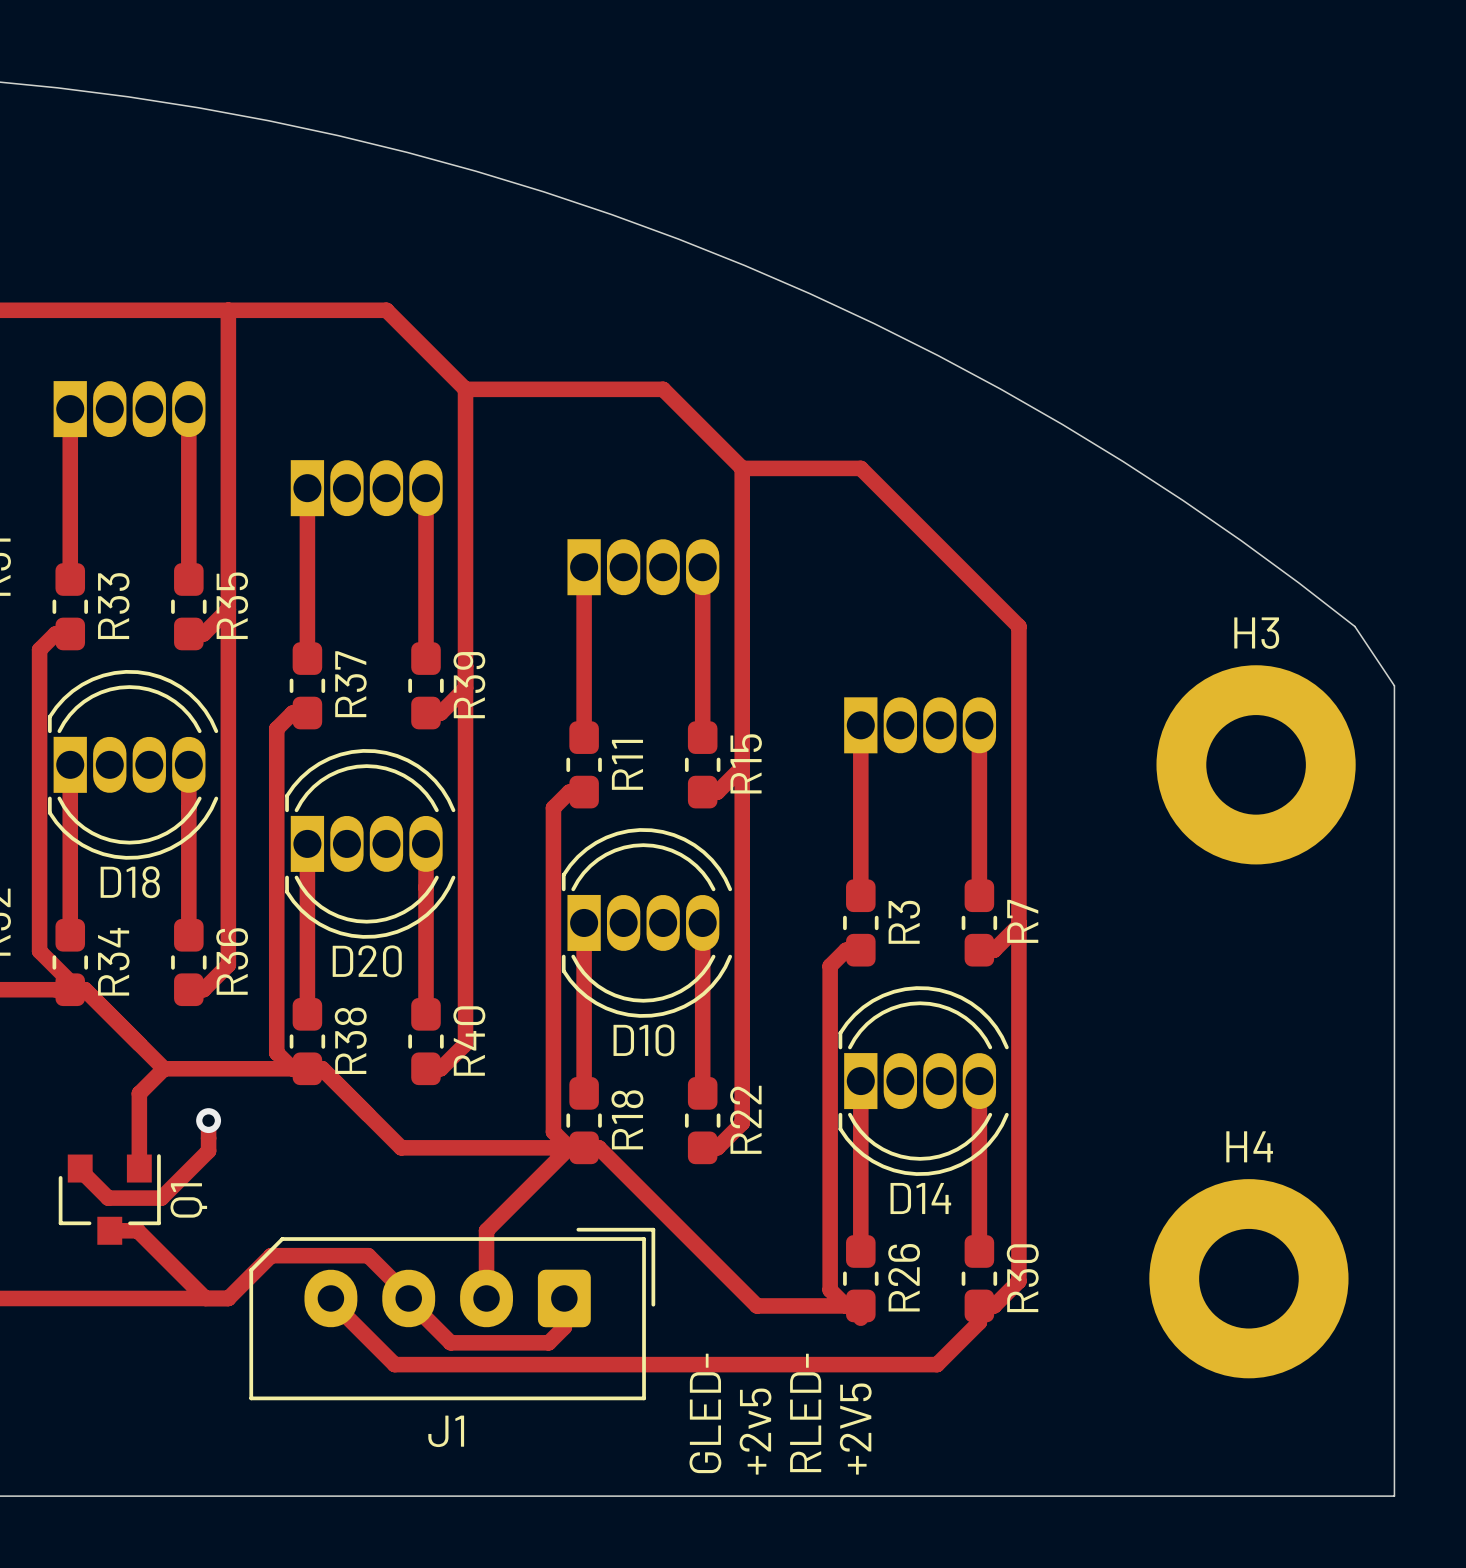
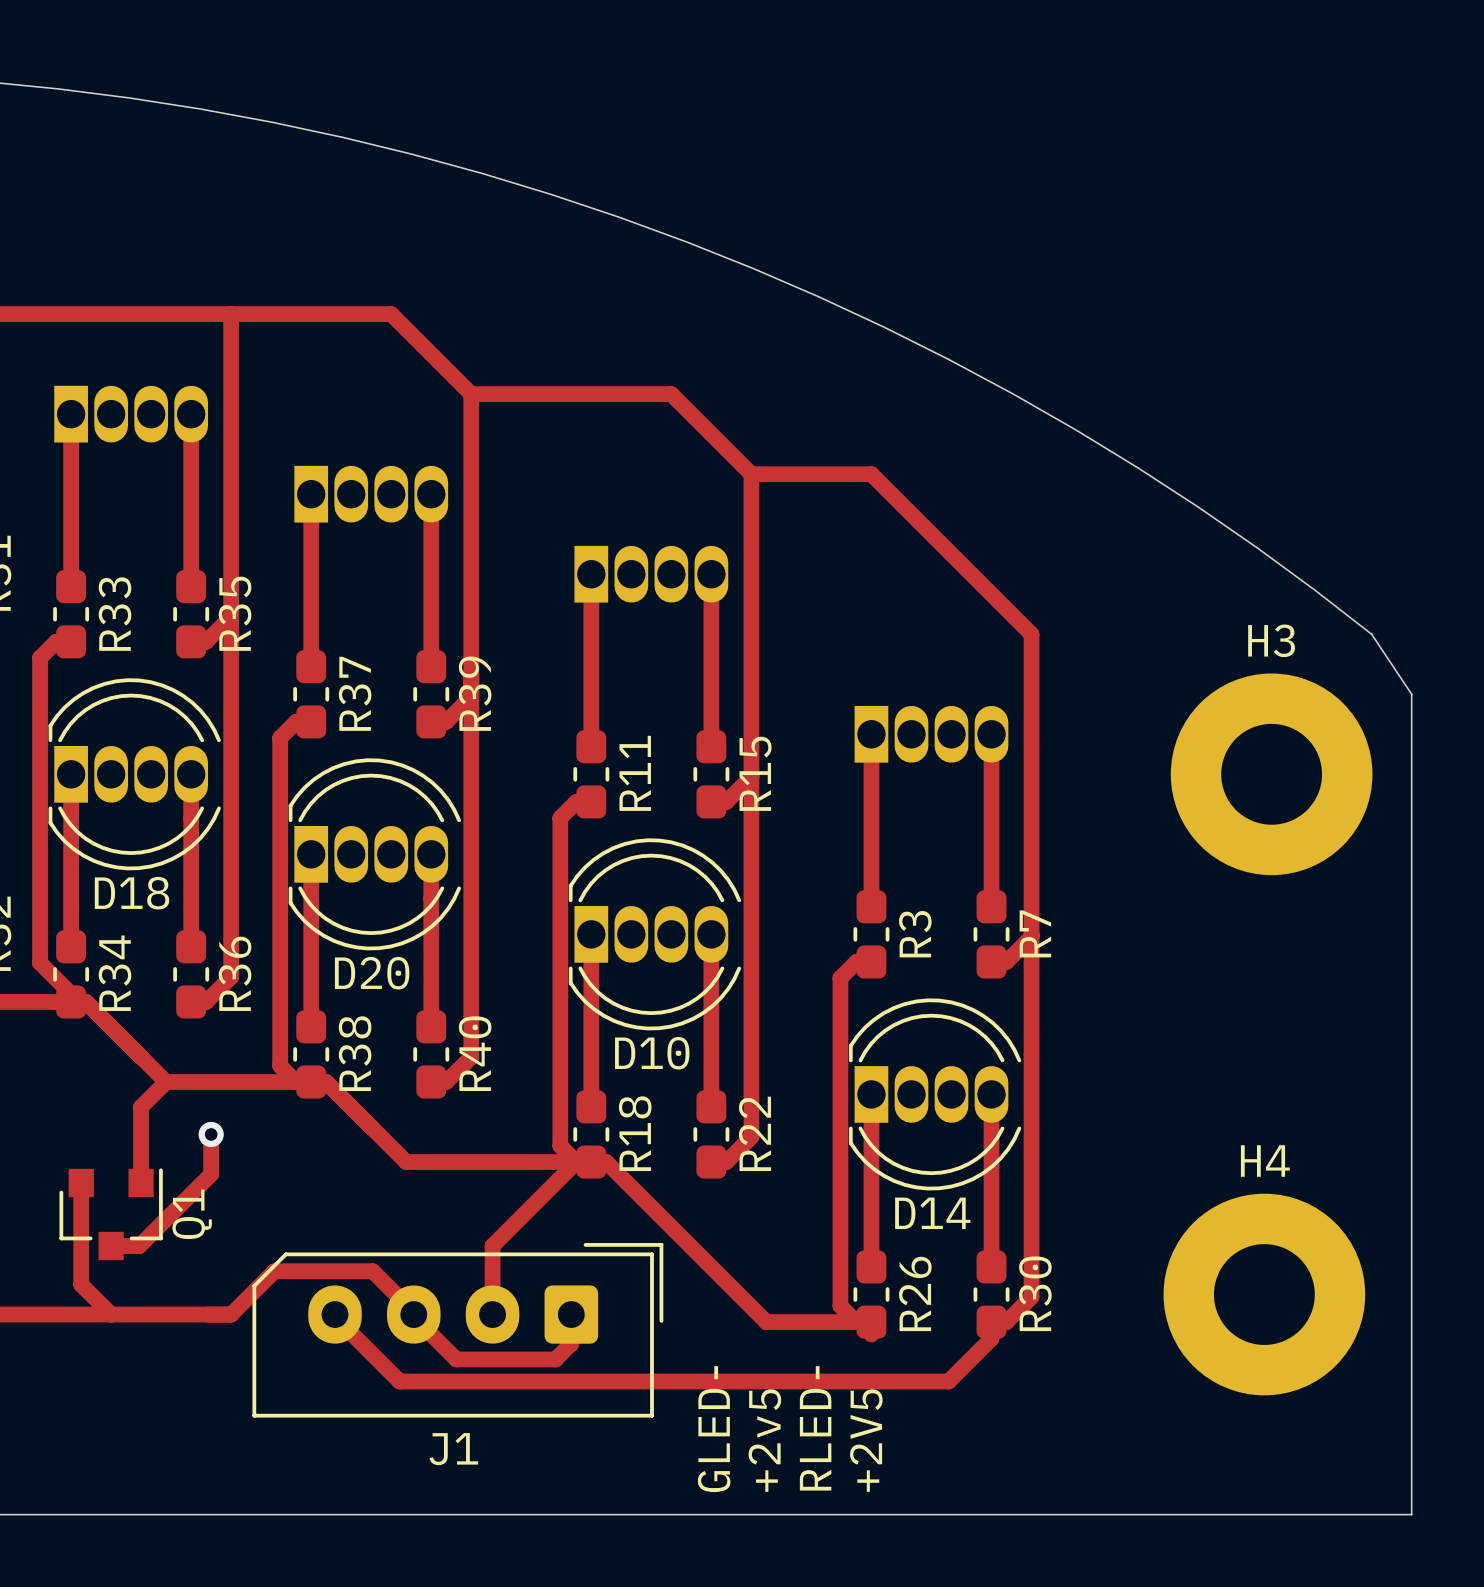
track: (208, 1150) (161, 1198) (108, 1198) (80, 1170) -> (211, 1165) (211, 1174) (139, 1246)
track: none -> (81, 1184) (81, 1284) (111, 1314)
track: (137, 1230) (205, 1298) -> none

